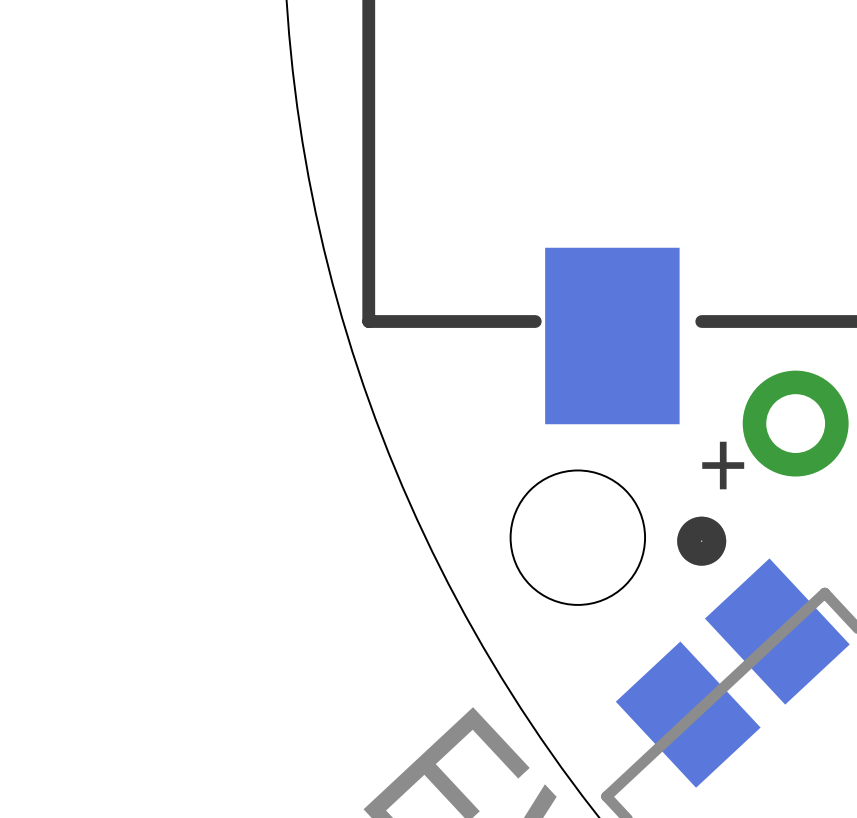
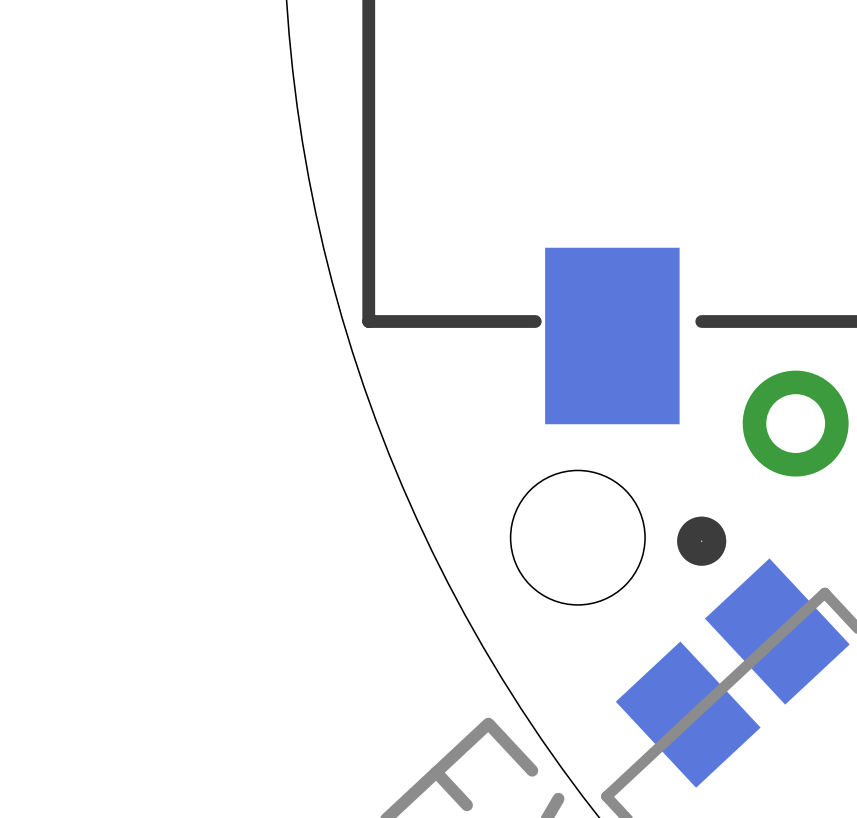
text: + (723, 465) -> none

